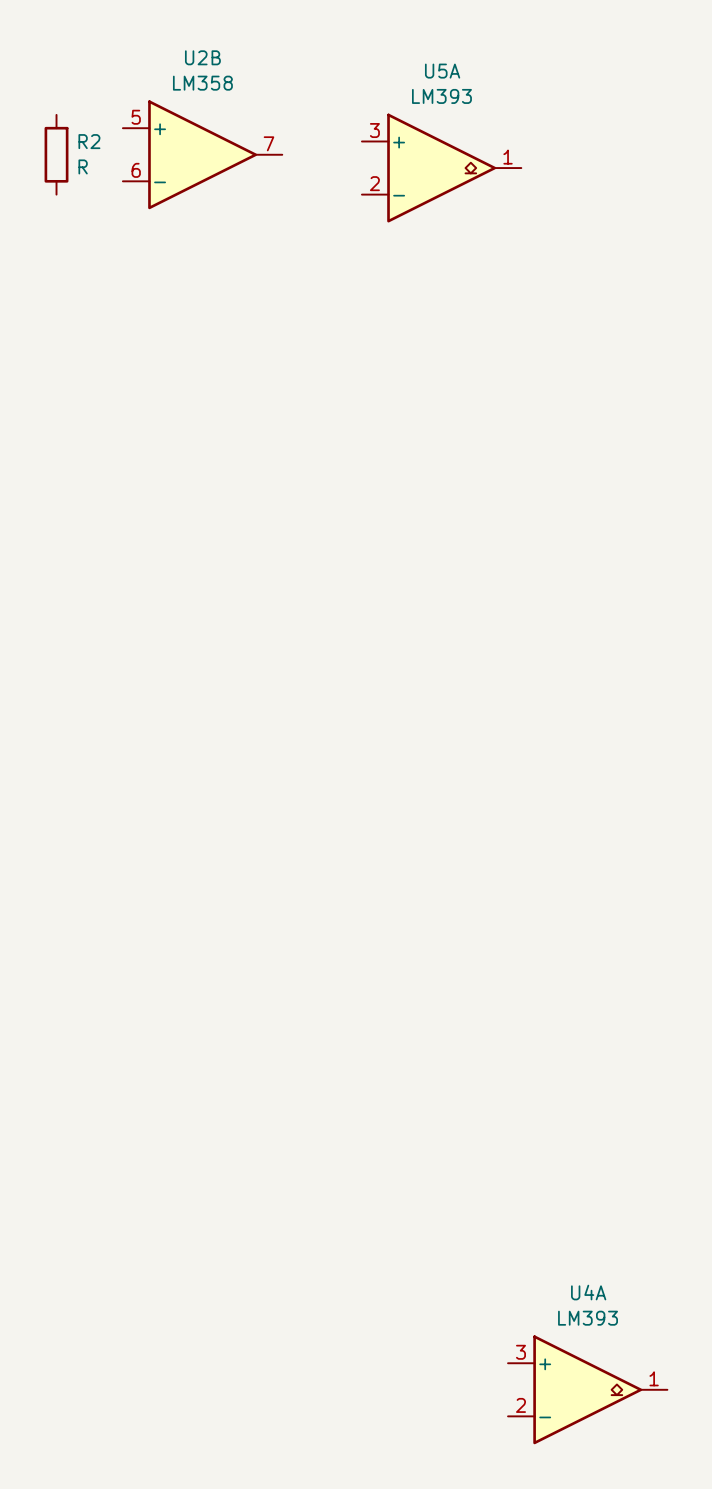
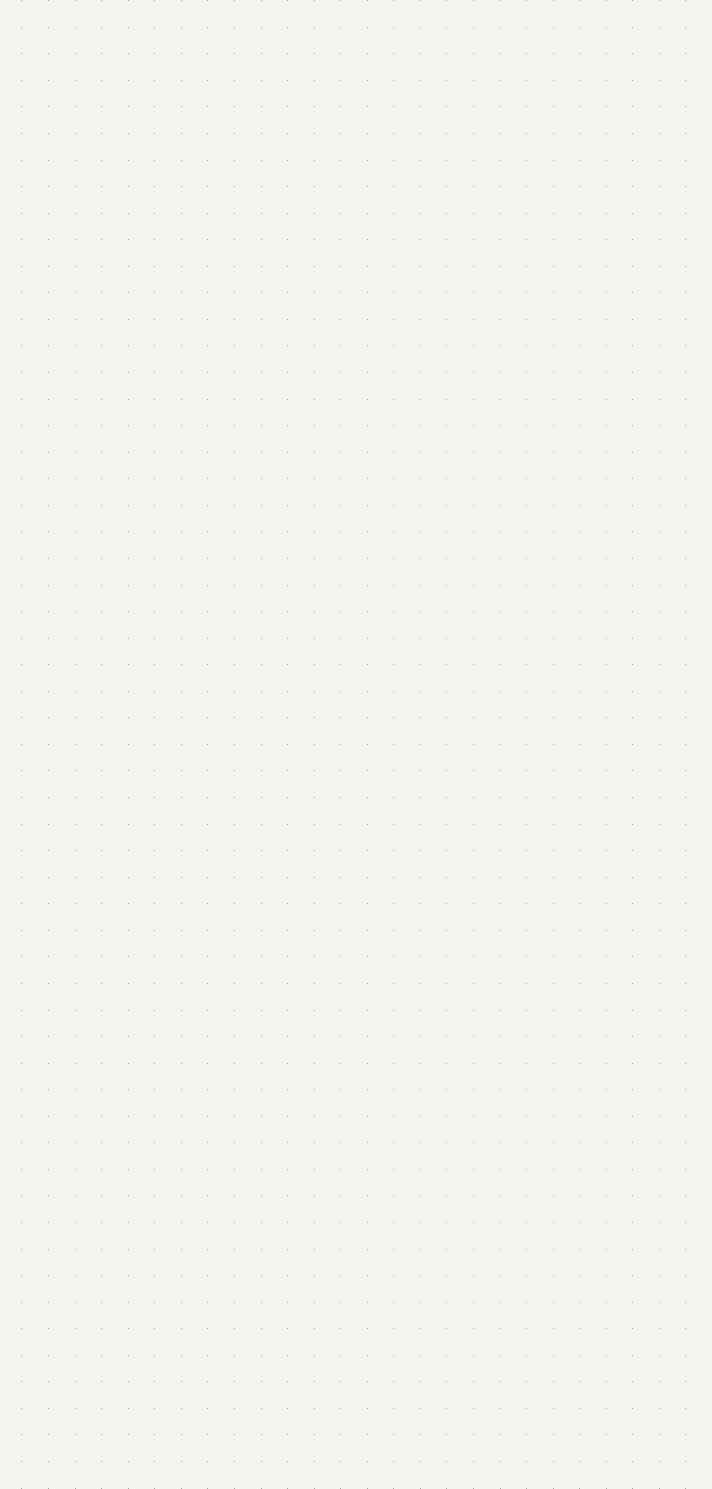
R2: R (56, 154) -> none
U2B: LM358 (202, 154) -> none
U5A: LM393 (441, 168) -> none
U4A: LM393 (587, 1389) -> none

